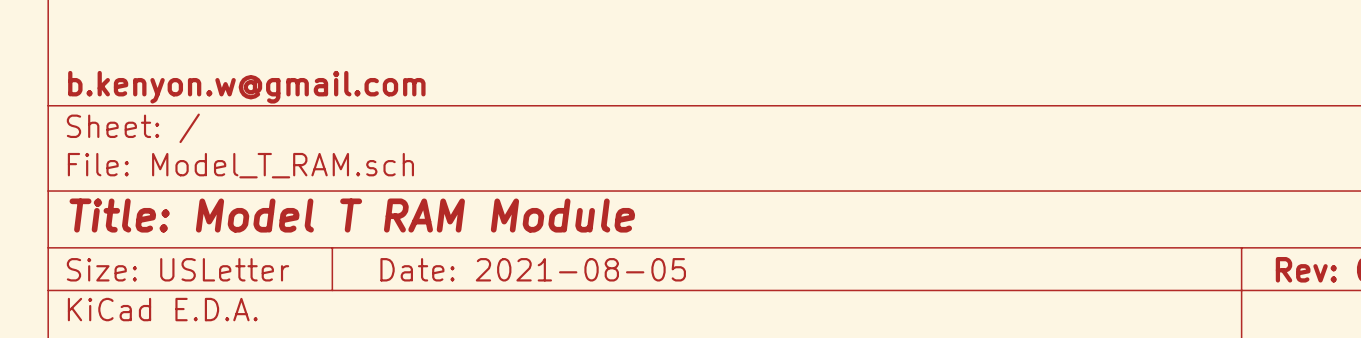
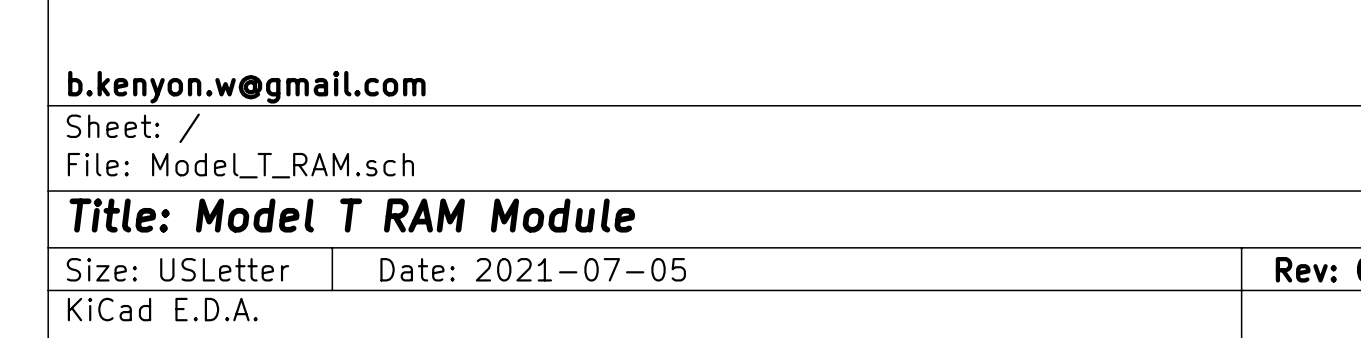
title block: Date: 2021-08-05 (533, 269) -> Date: 2021-07-05 (533, 269)

